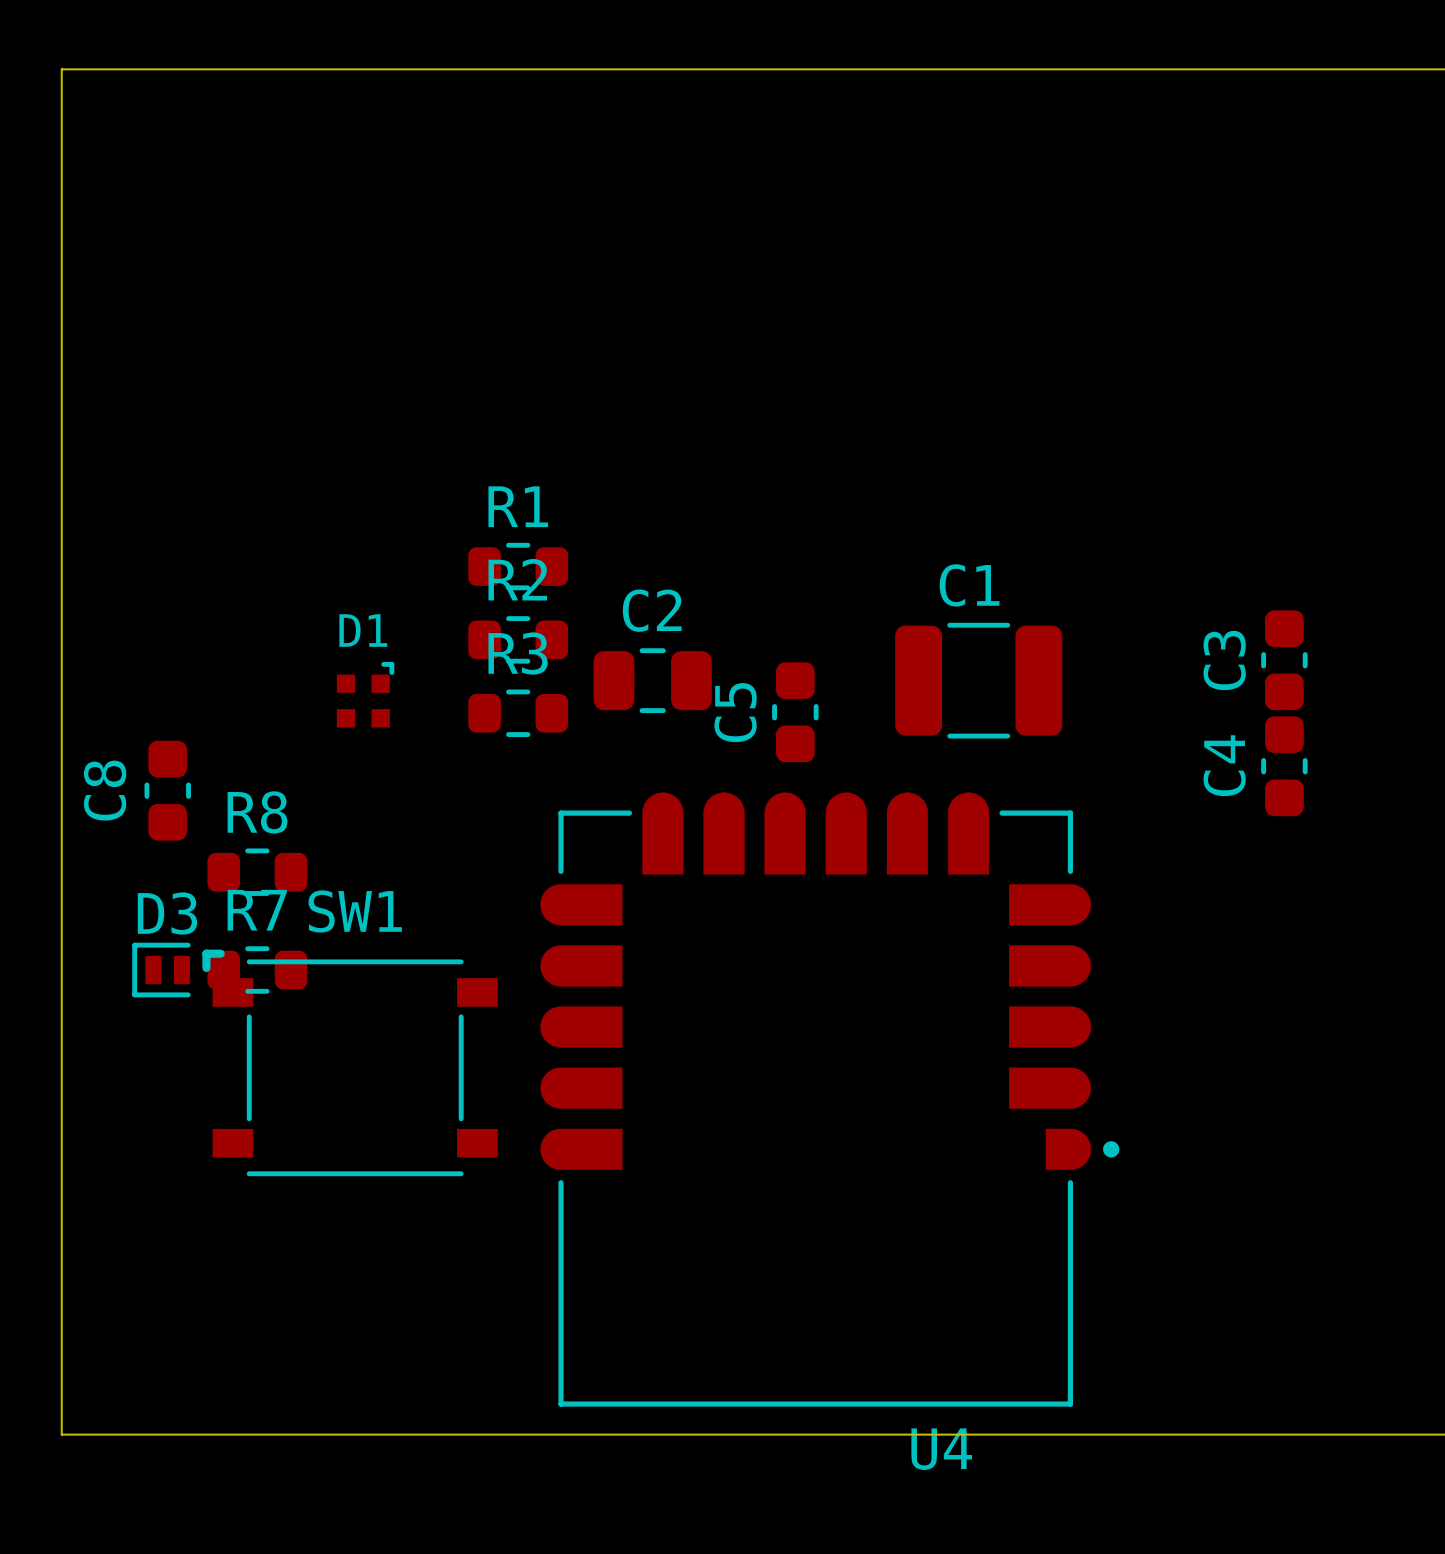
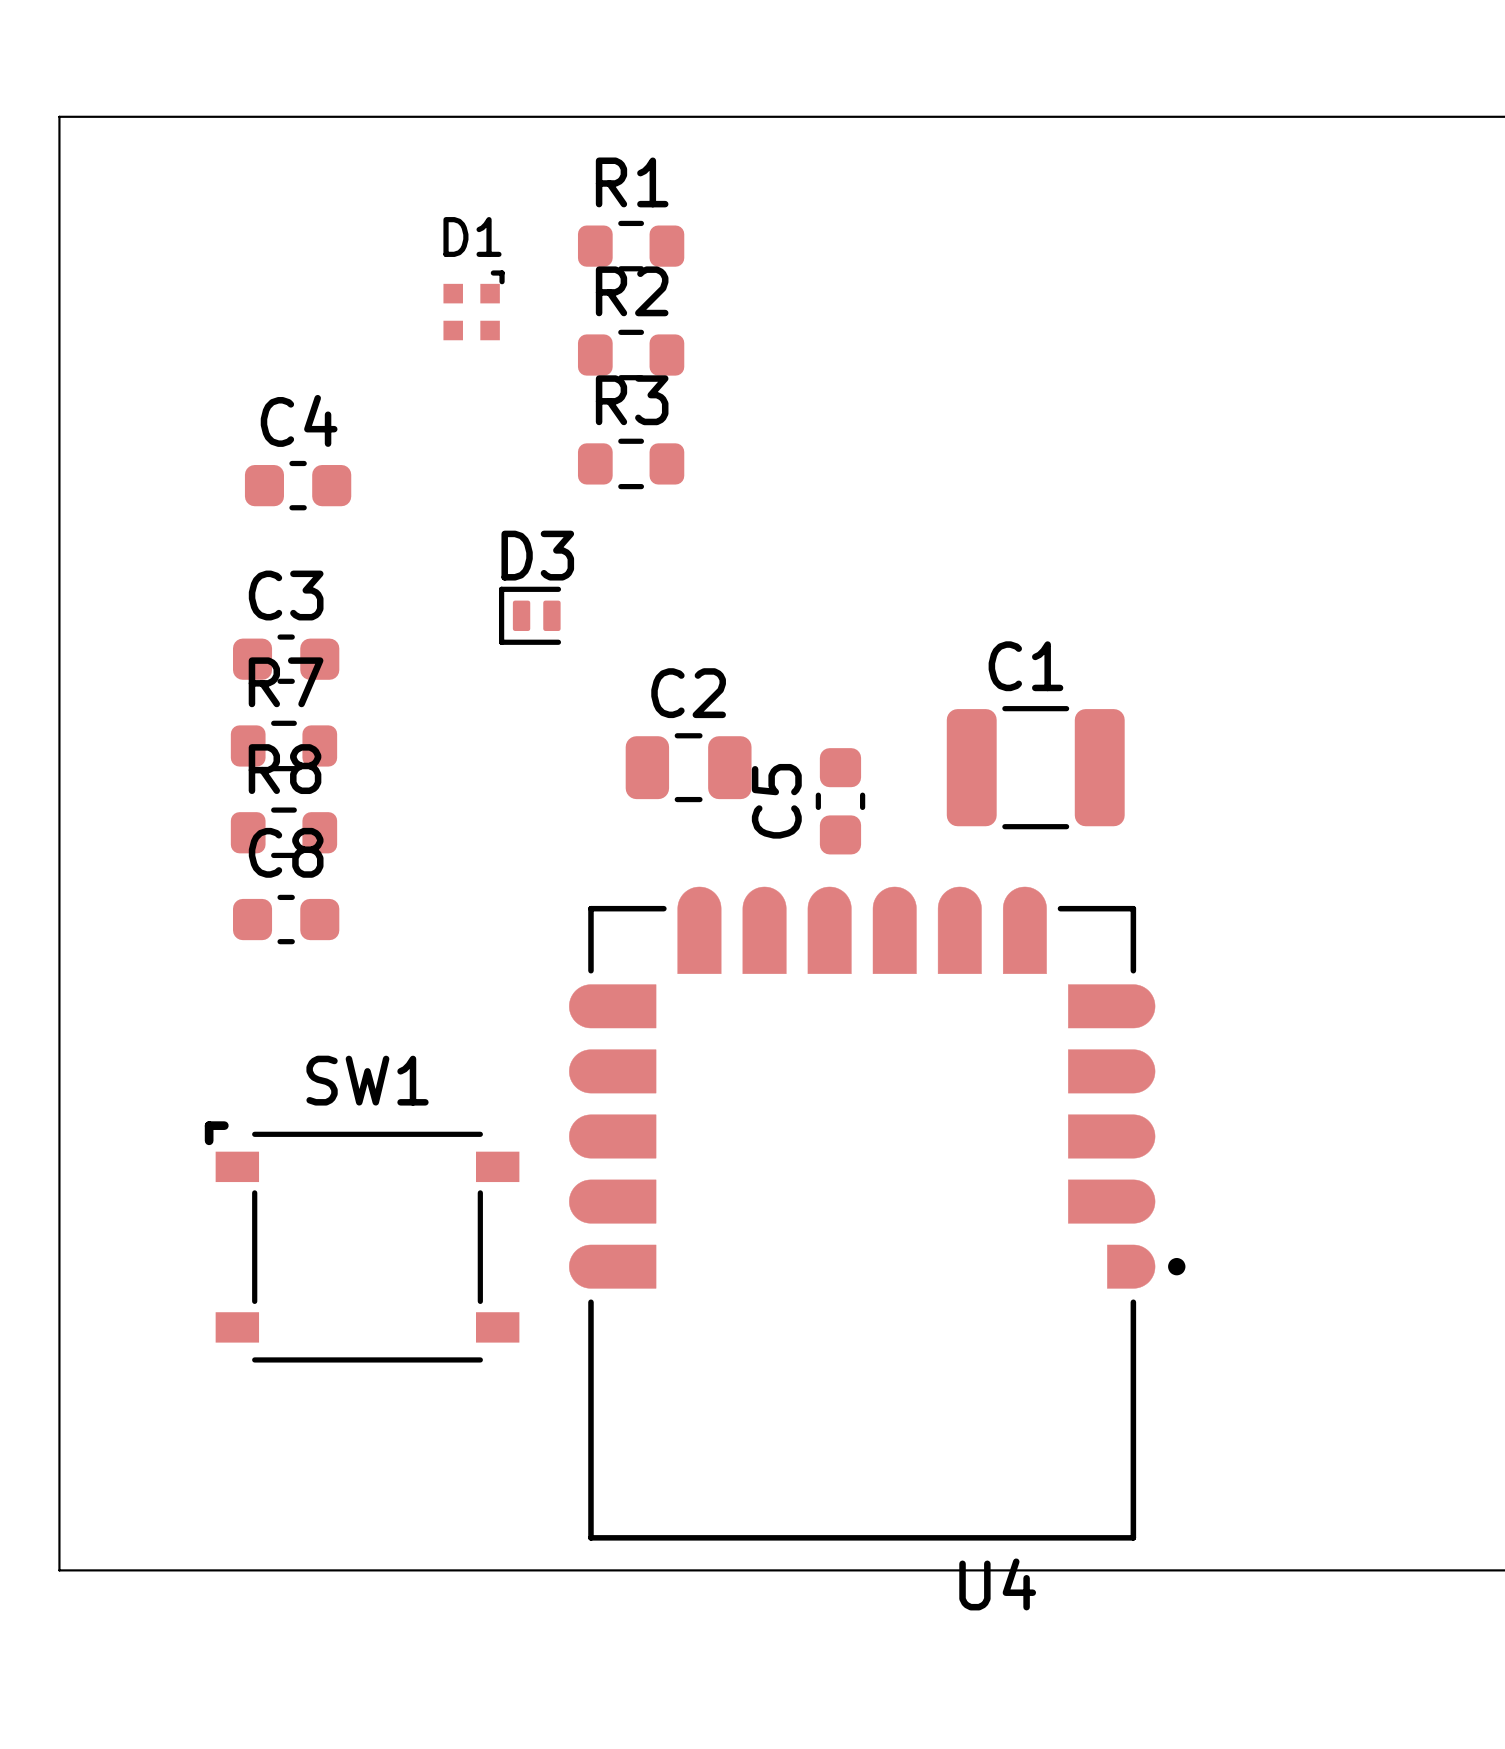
R1 position: (518, 566) -> (631, 246)
R2 position: (518, 639) -> (631, 355)
C3 rotation: 0° (1284, 660) -> 90° clockwise (286, 659)
C3 position: (1284, 660) -> (286, 659)
D1 position: (365, 694) -> (474, 305)
R3 position: (518, 713) -> (631, 463)
C4 rotation: 0° (1284, 766) -> 90° clockwise (298, 485)
C4 position: (1284, 766) -> (298, 485)
C8 rotation: 0° (167, 790) -> 90° clockwise (286, 919)
C8 position: (167, 790) -> (286, 919)
R8 position: (257, 872) -> (283, 832)
D3 position: (161, 970) -> (530, 615)
R7 position: (257, 970) -> (283, 745)
SW1 position: (350, 1062) -> (362, 1241)

